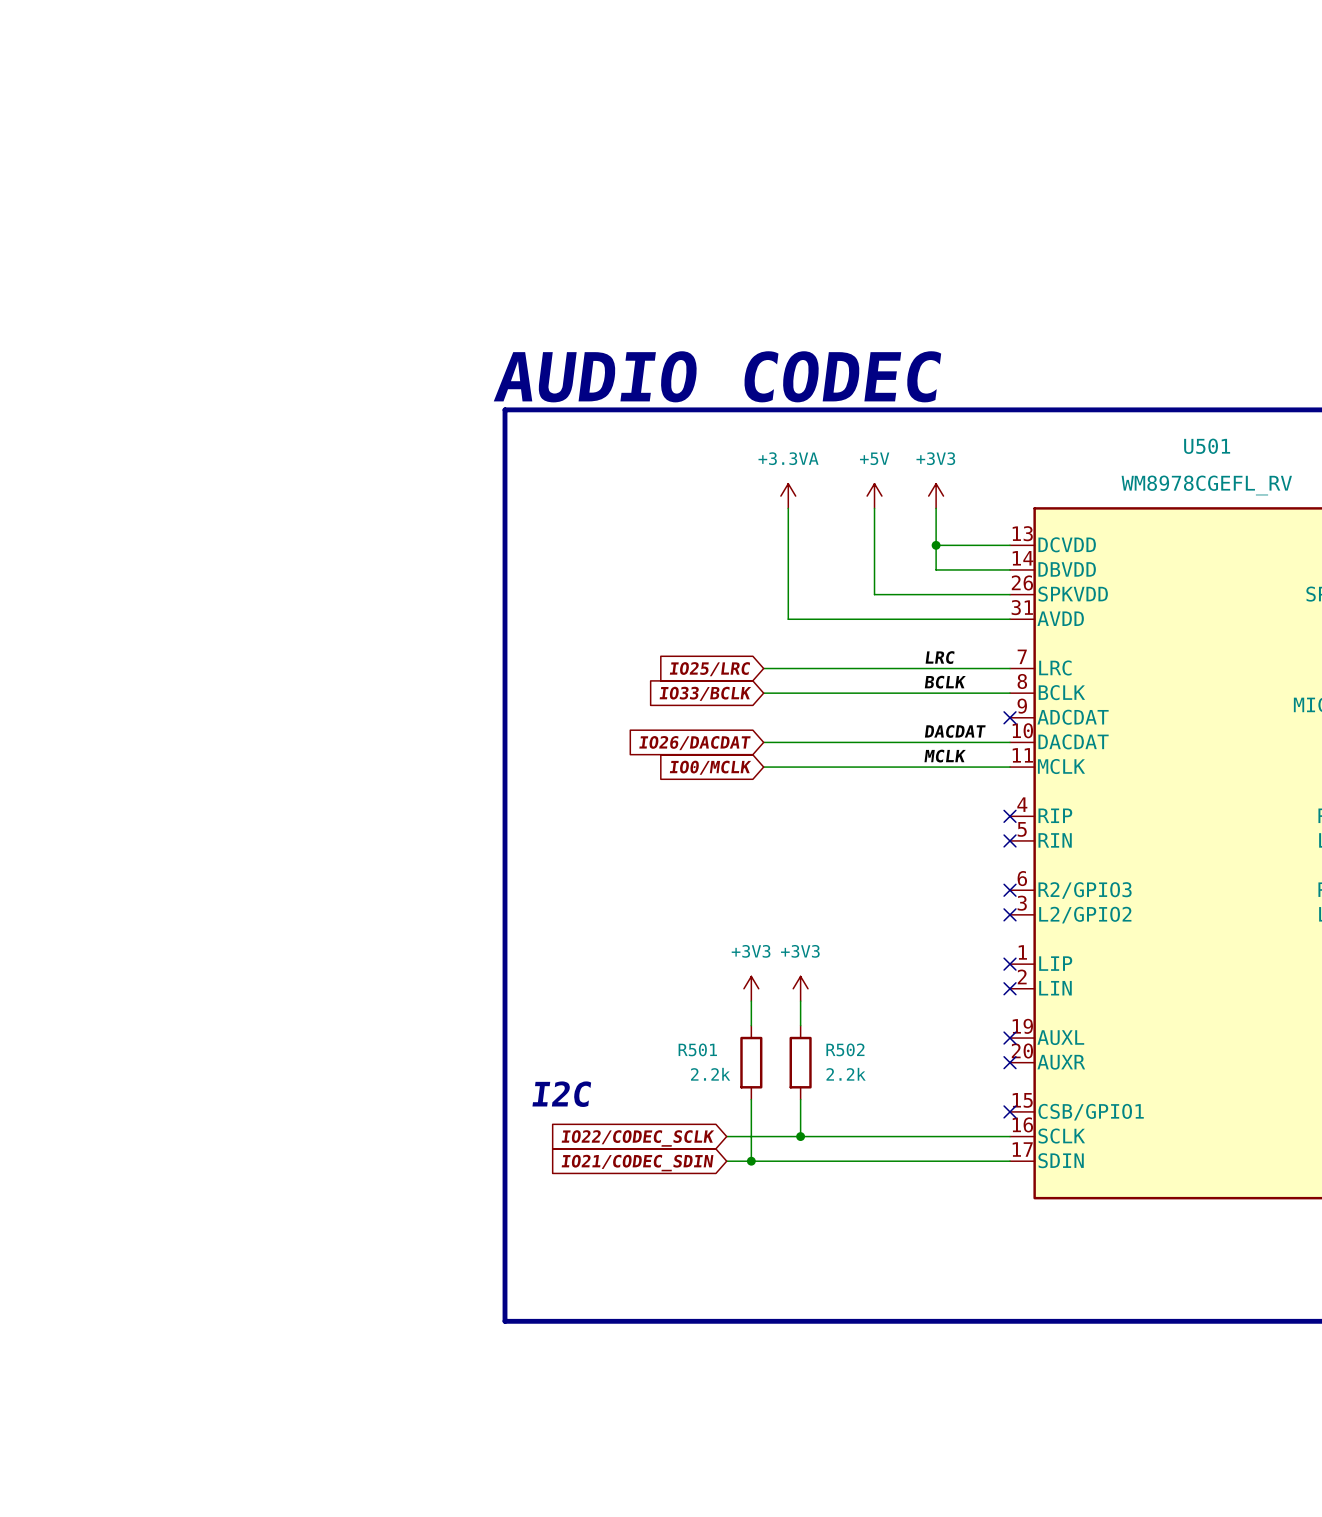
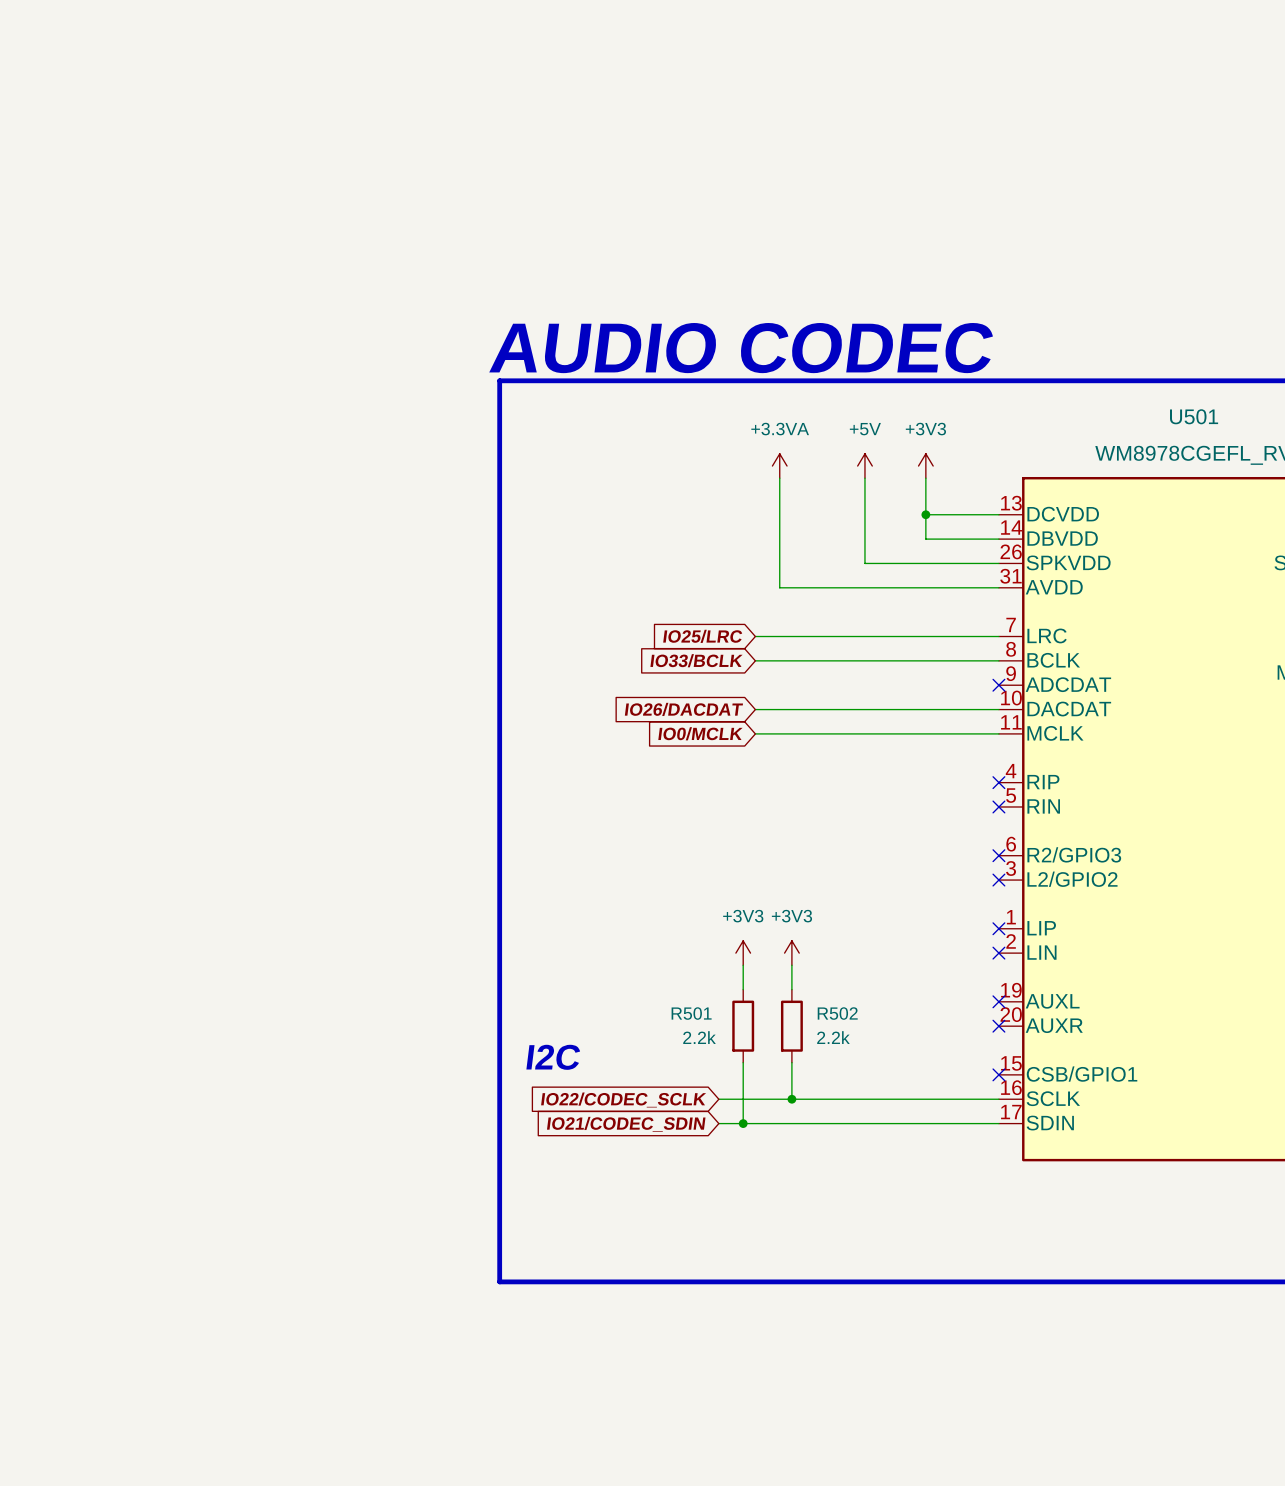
label: LRC (940, 657) -> none
label: BCLK (945, 682) -> none
label: DACDAT (955, 731) -> none
label: MCLK (945, 756) -> none

